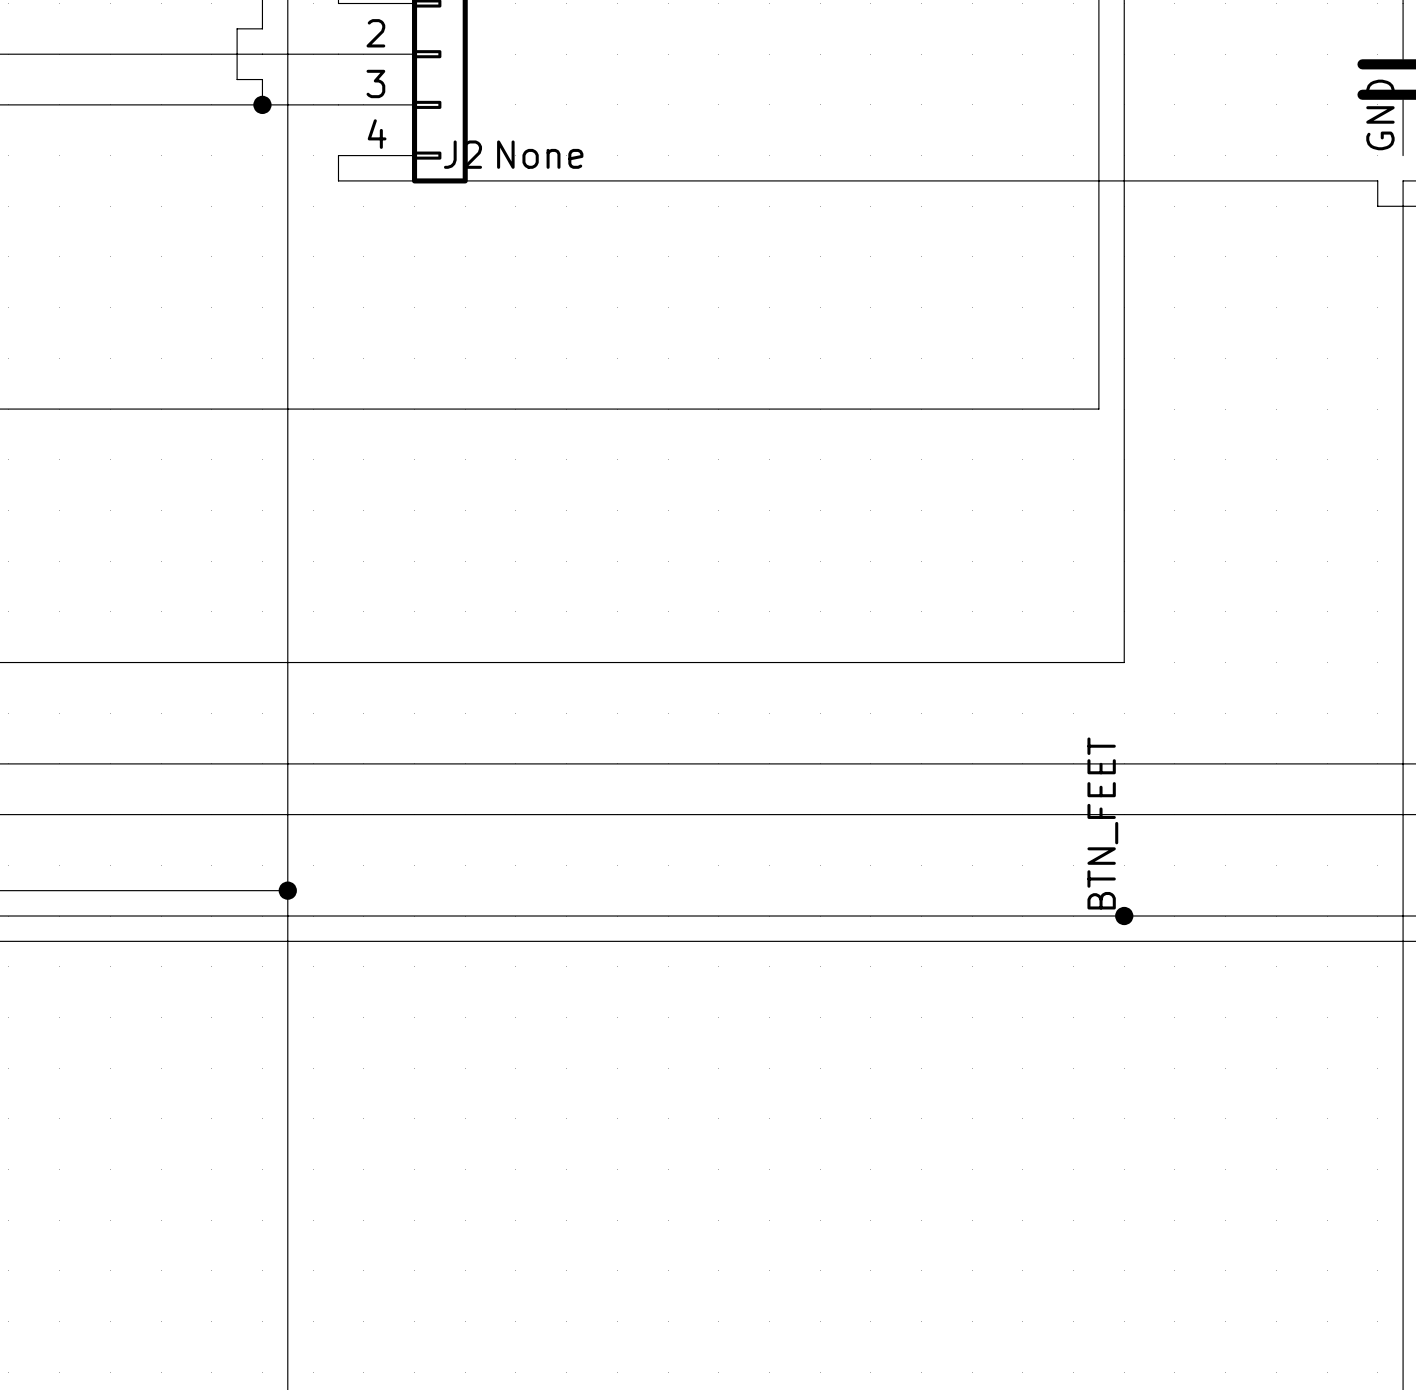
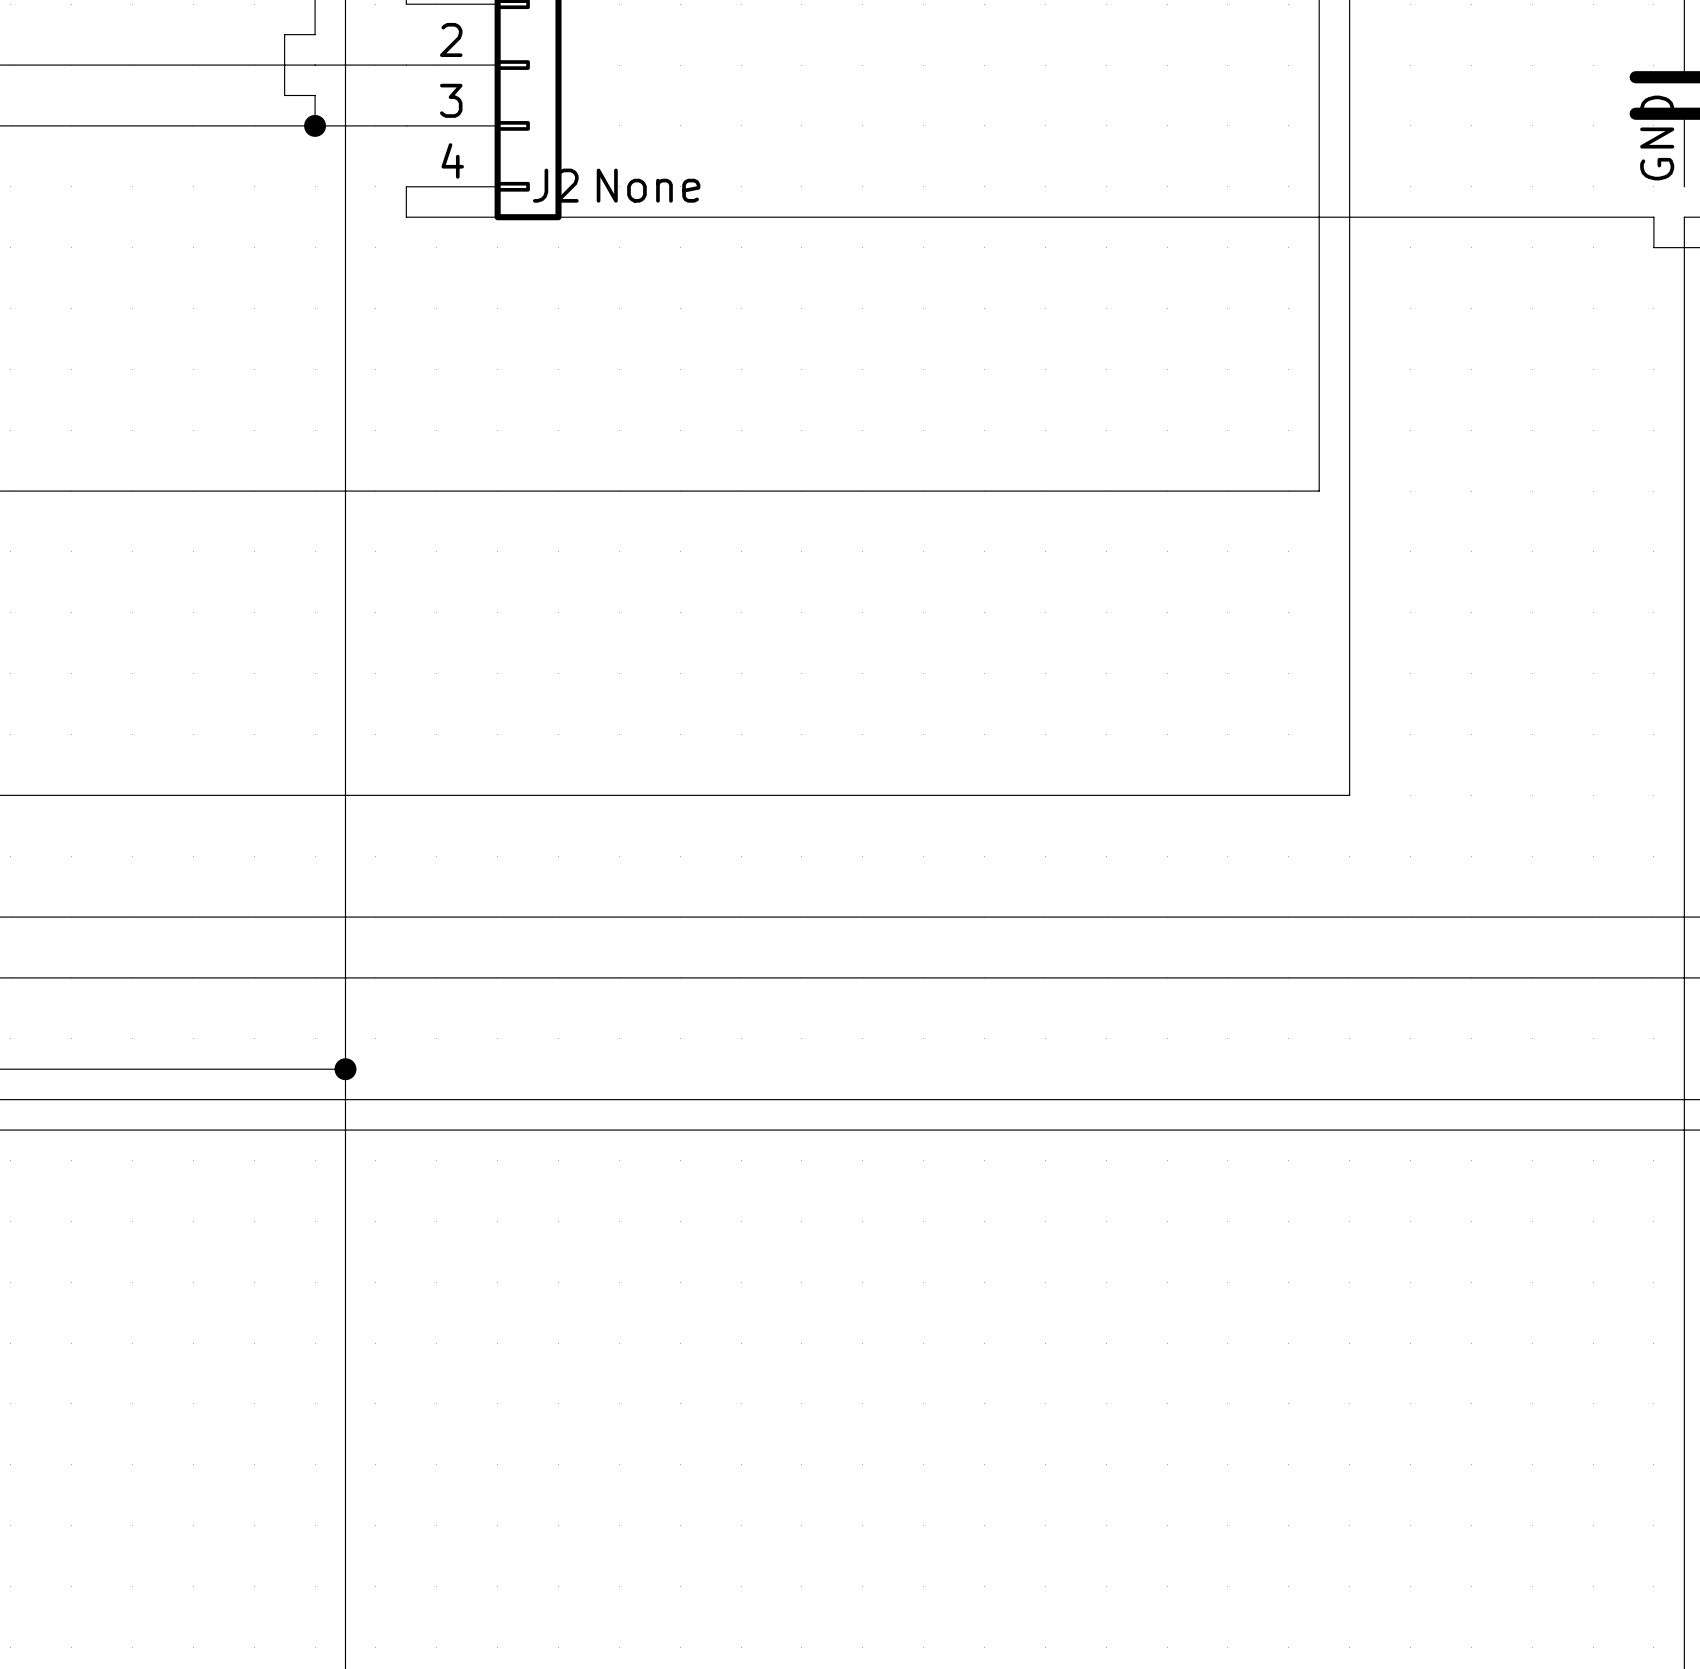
label: BTN_FEET (1102, 823) -> none
junction: (1124, 916) -> none

